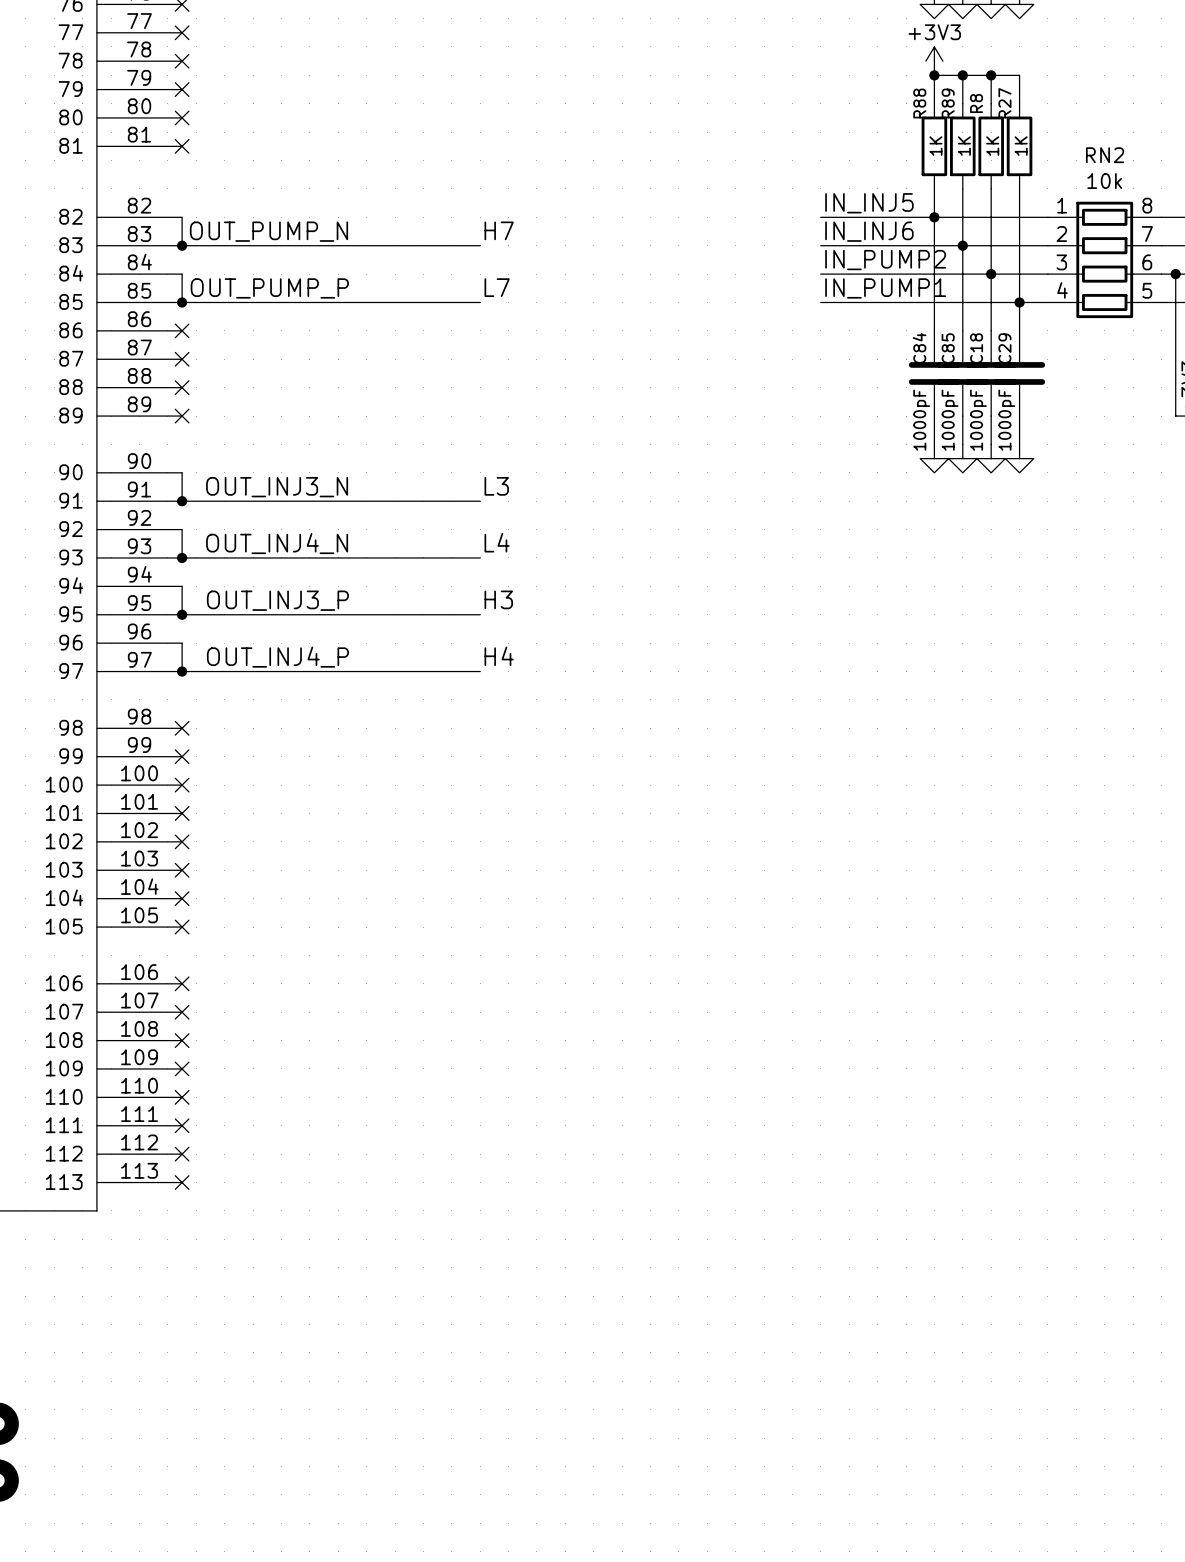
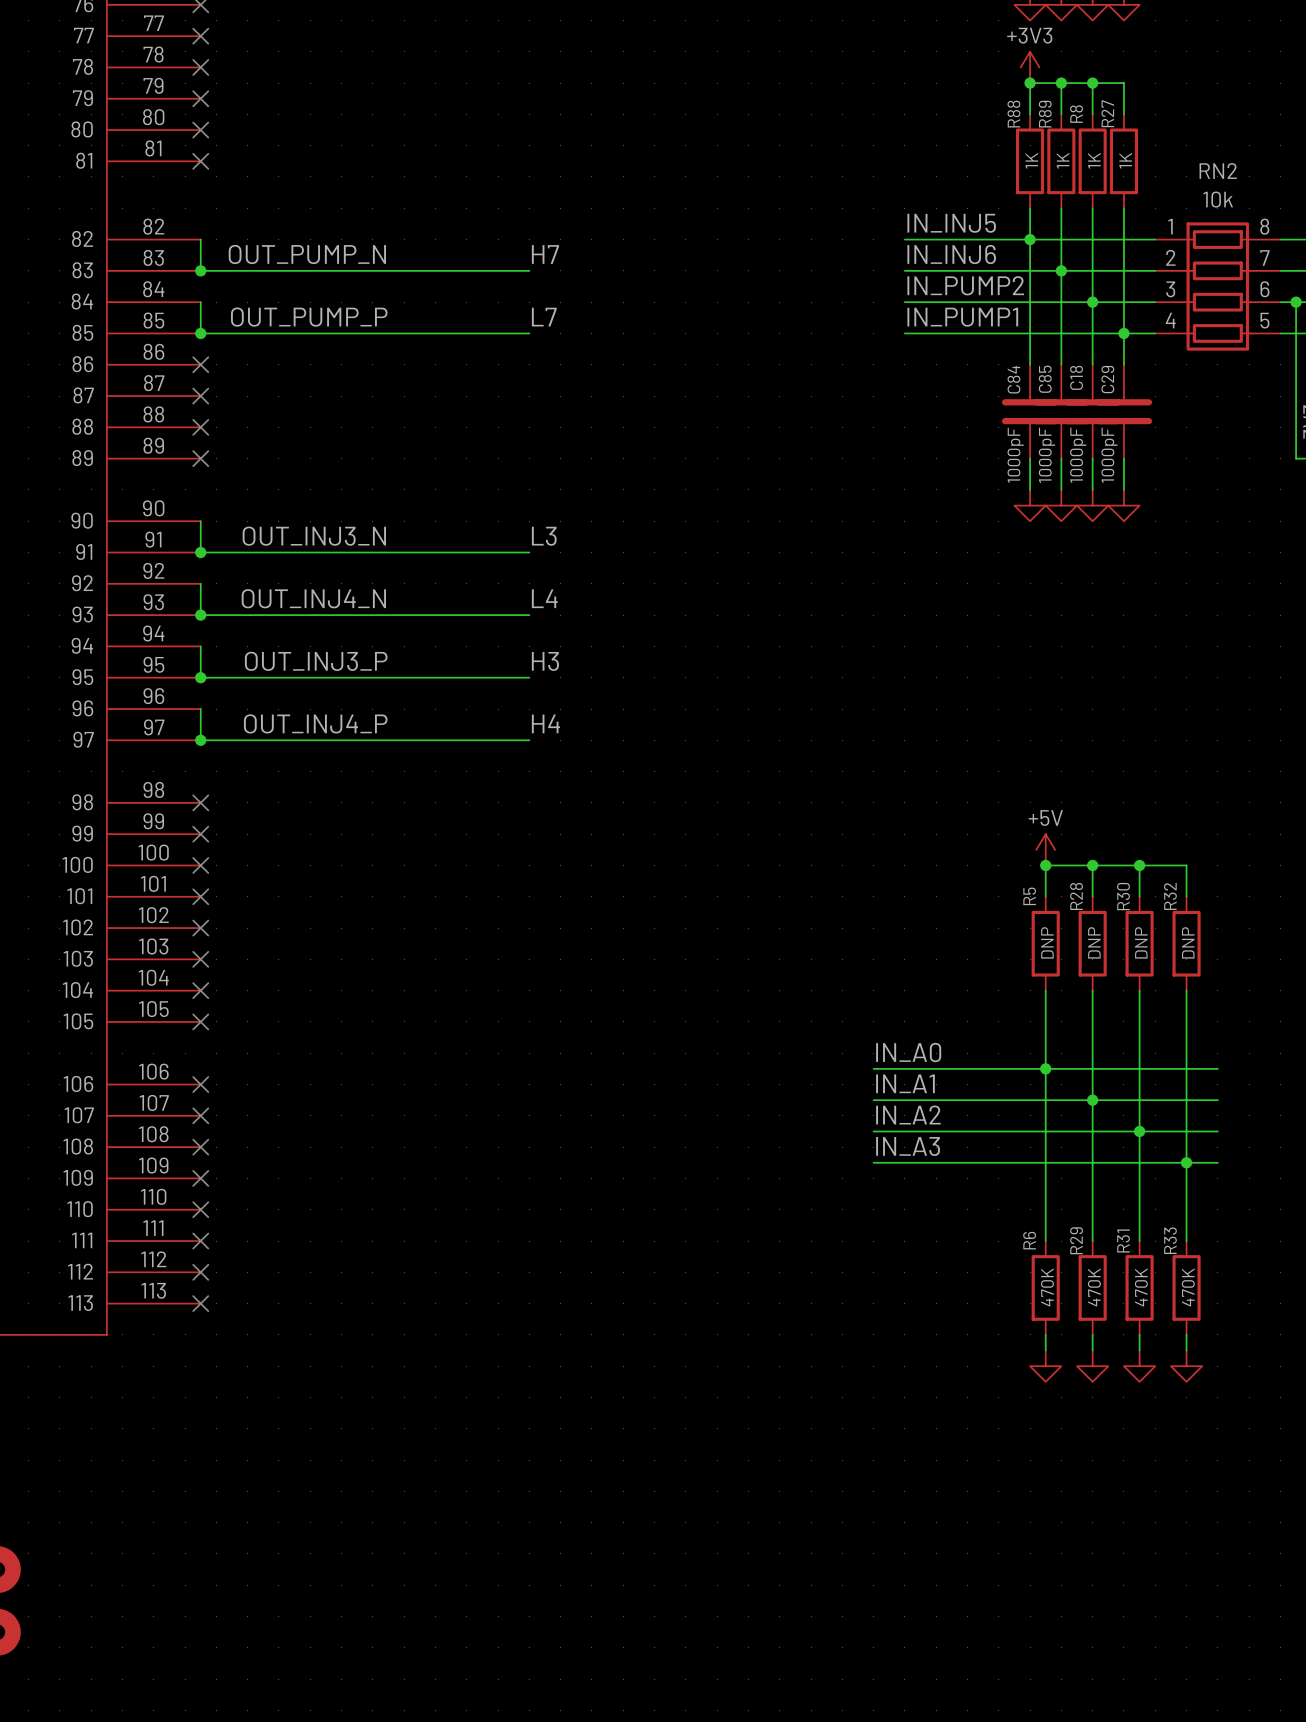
power symbol: none -> +5V (1045, 849)
junction: none -> (1045, 865)
wire: none -> (1092, 865) (1092, 896)
junction: none -> (1092, 865)
wire: none -> (1139, 865) (1139, 896)
junction: none -> (1139, 865)
wire: none -> (1045, 896) (1045, 865) (1186, 865) (1186, 896)
R5: none -> DNP (1045, 943)
R28: none -> DNP (1092, 943)
R30: none -> DNP (1139, 943)
R32: none -> DNP (1186, 943)
wire: none -> (1045, 990) (1045, 1241)
wire: none -> (1092, 990) (1092, 1241)
wire: none -> (1139, 990) (1139, 1241)
wire: none -> (1186, 990) (1186, 1241)
label: none -> IN_A0 (908, 1052)
wire: none -> (873, 1068) (1217, 1068)
junction: none -> (1045, 1068)
label: none -> IN_A1 (905, 1083)
wire: none -> (873, 1100) (1217, 1100)
junction: none -> (1092, 1100)
label: none -> IN_A2 (908, 1114)
wire: none -> (873, 1131) (1217, 1131)
junction: none -> (1139, 1131)
label: none -> IN_A3 (908, 1146)
wire: none -> (873, 1162) (1217, 1162)
junction: none -> (1186, 1162)
R6: none -> 470K (1045, 1287)
R29: none -> 470K (1092, 1287)
R31: none -> 470K (1139, 1287)
R33: none -> 470K (1186, 1287)
wire: none -> (1045, 1334) (1045, 1350)
wire: none -> (1092, 1334) (1092, 1350)
wire: none -> (1139, 1334) (1139, 1350)
wire: none -> (1186, 1334) (1186, 1350)
power symbol: none -> (1045, 1366)
power symbol: none -> (1092, 1366)
power symbol: none -> (1139, 1366)
power symbol: none -> (1186, 1366)

